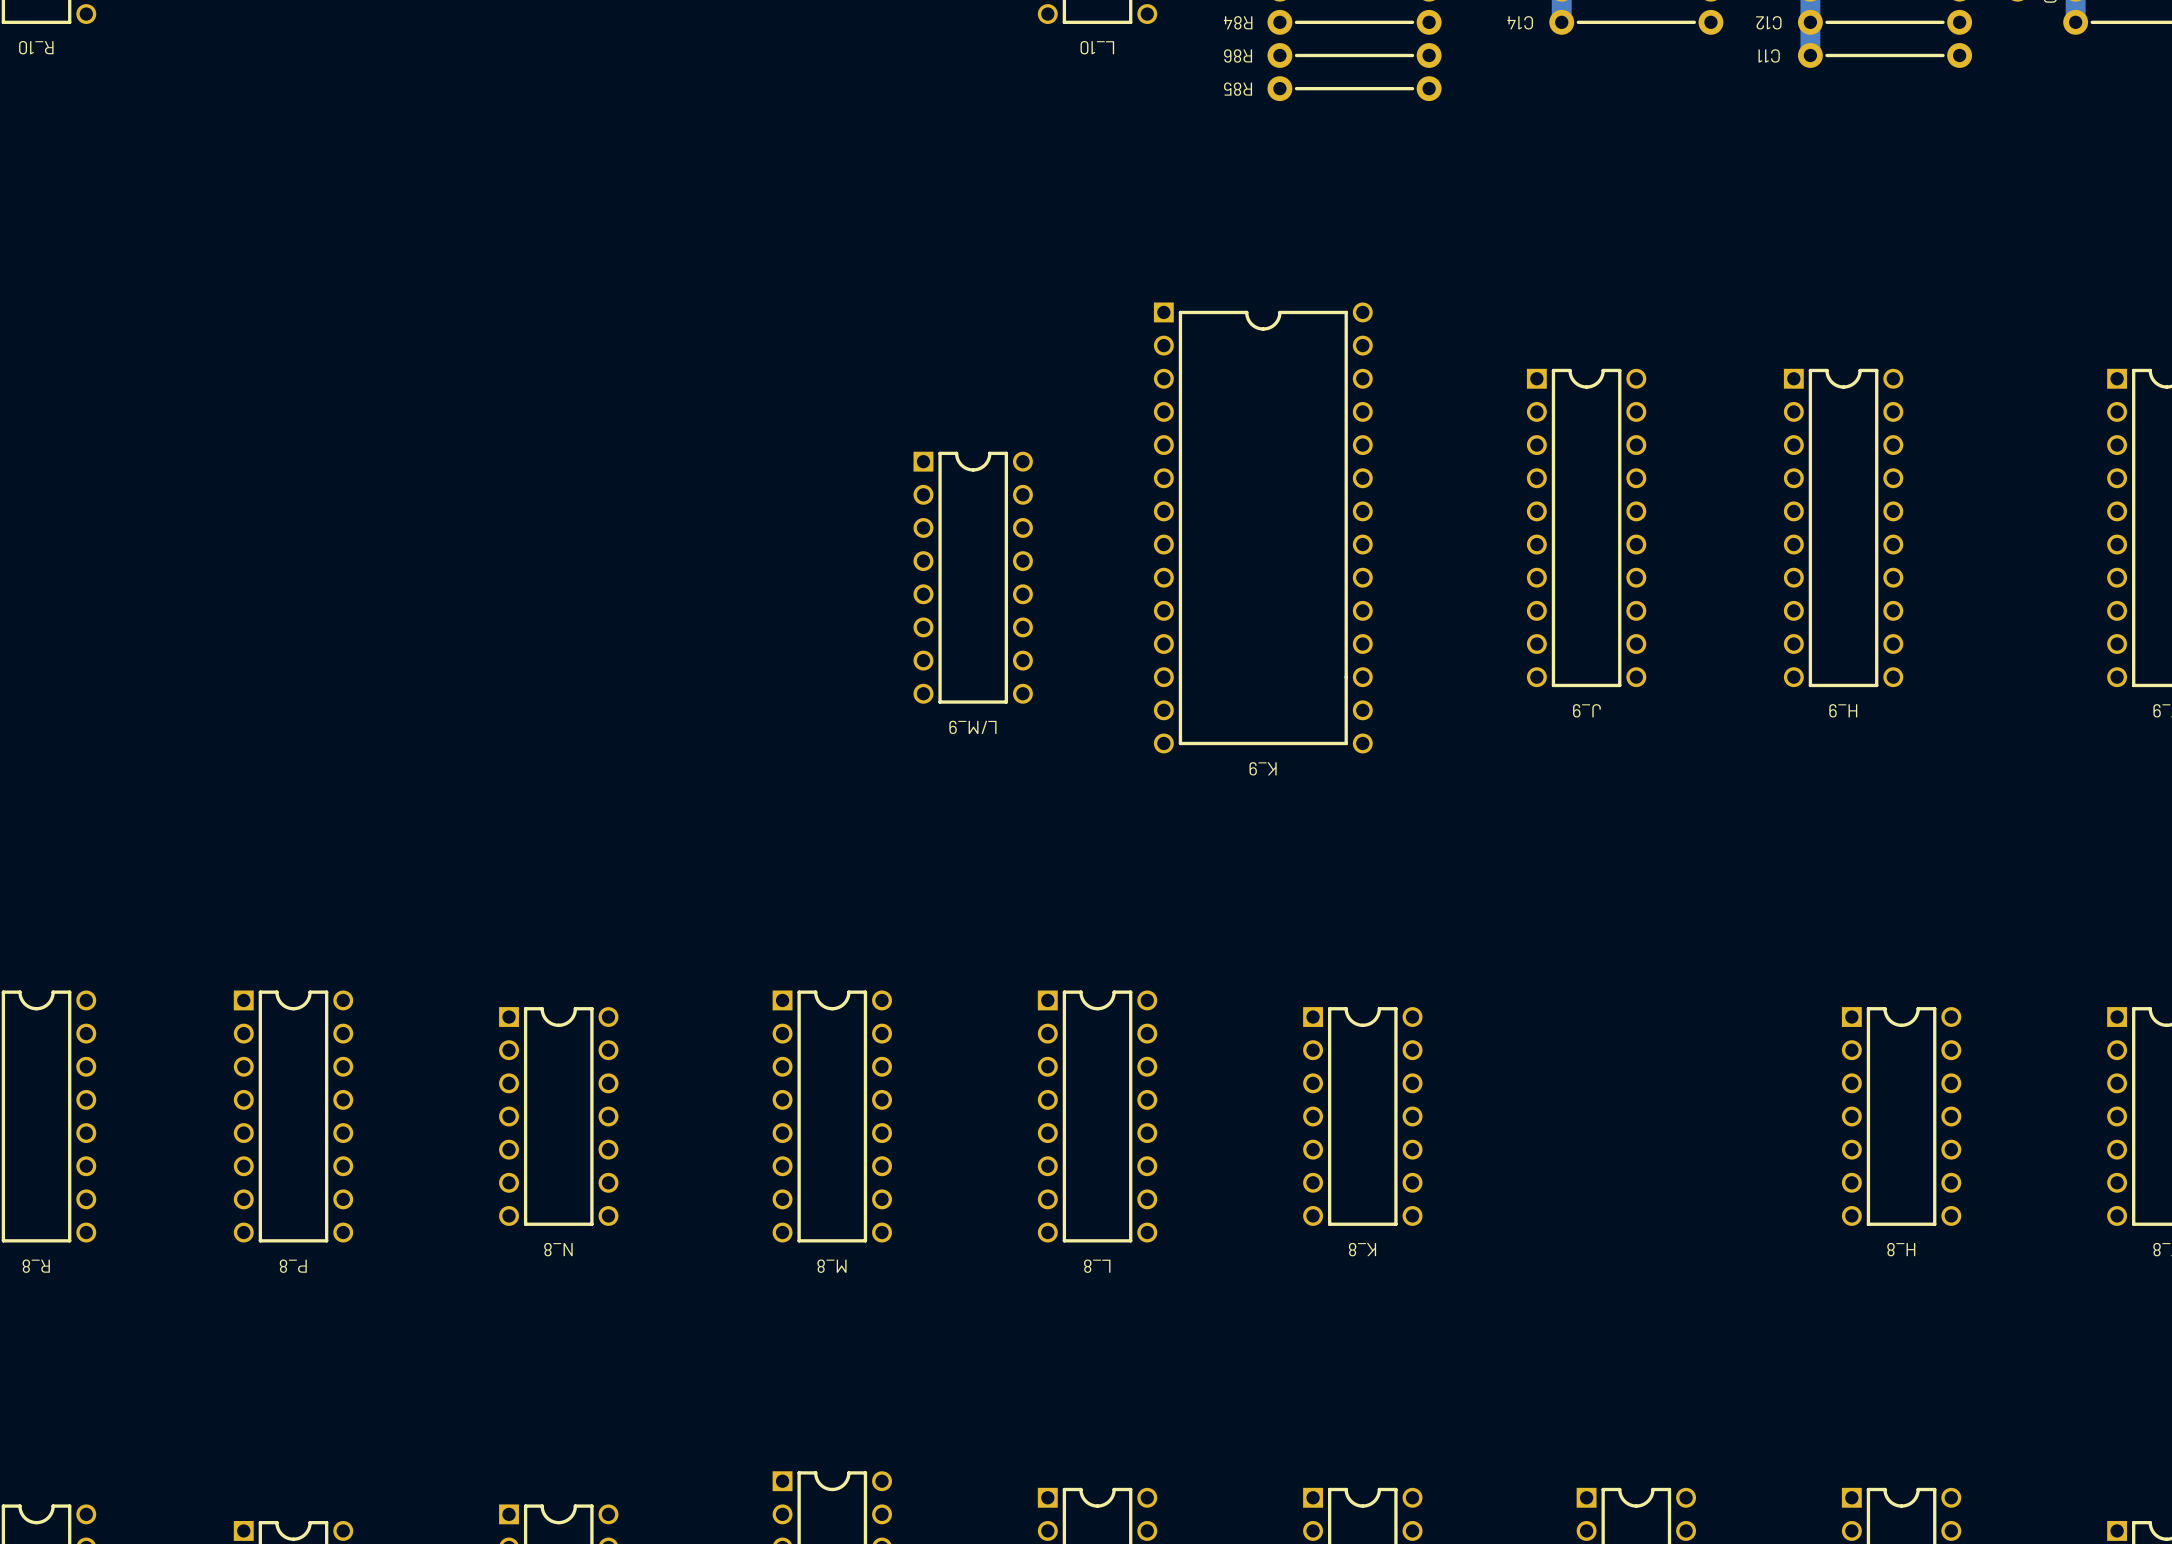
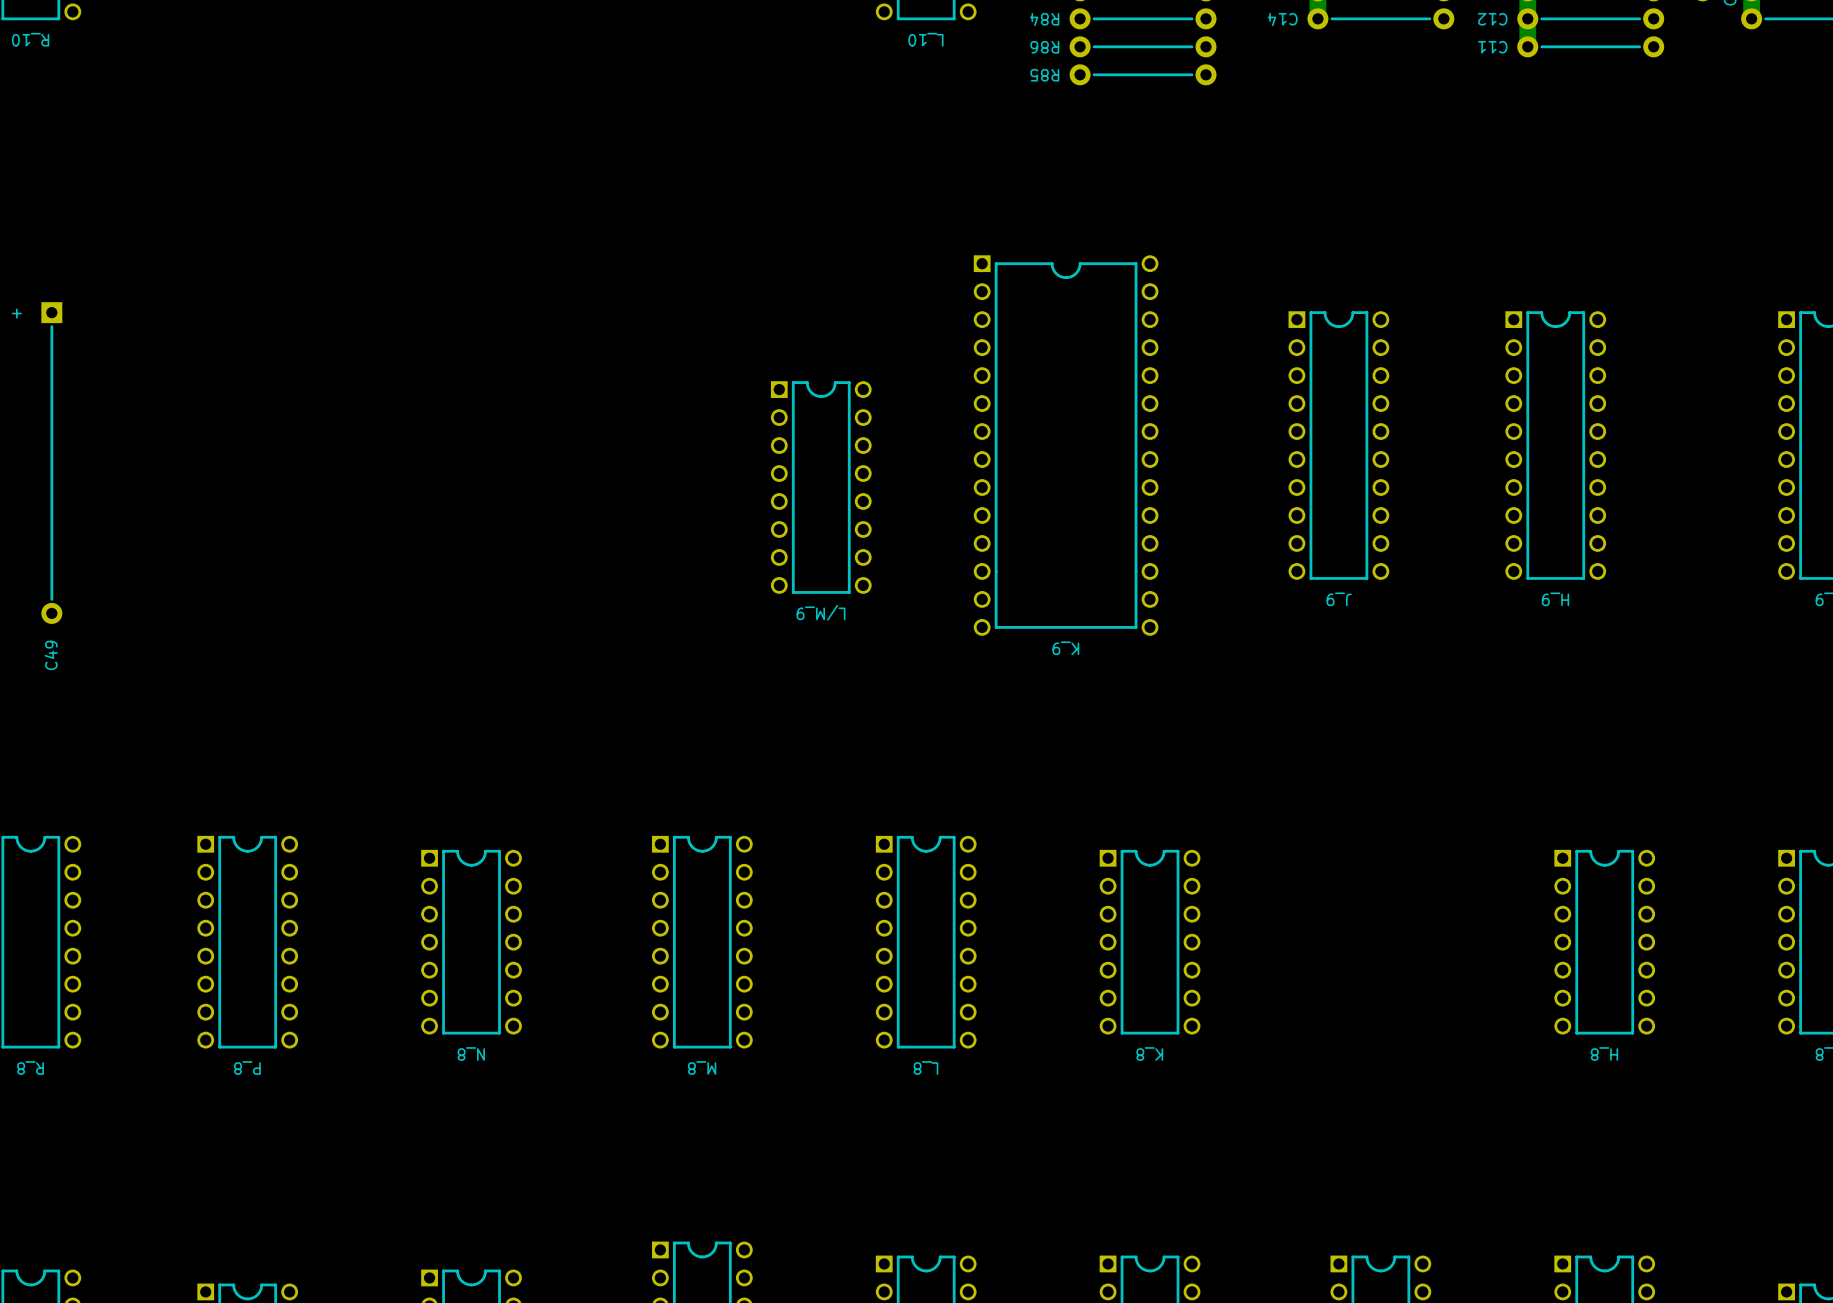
text: none -> + (16, 313)
C49: none -> (51, 463)

